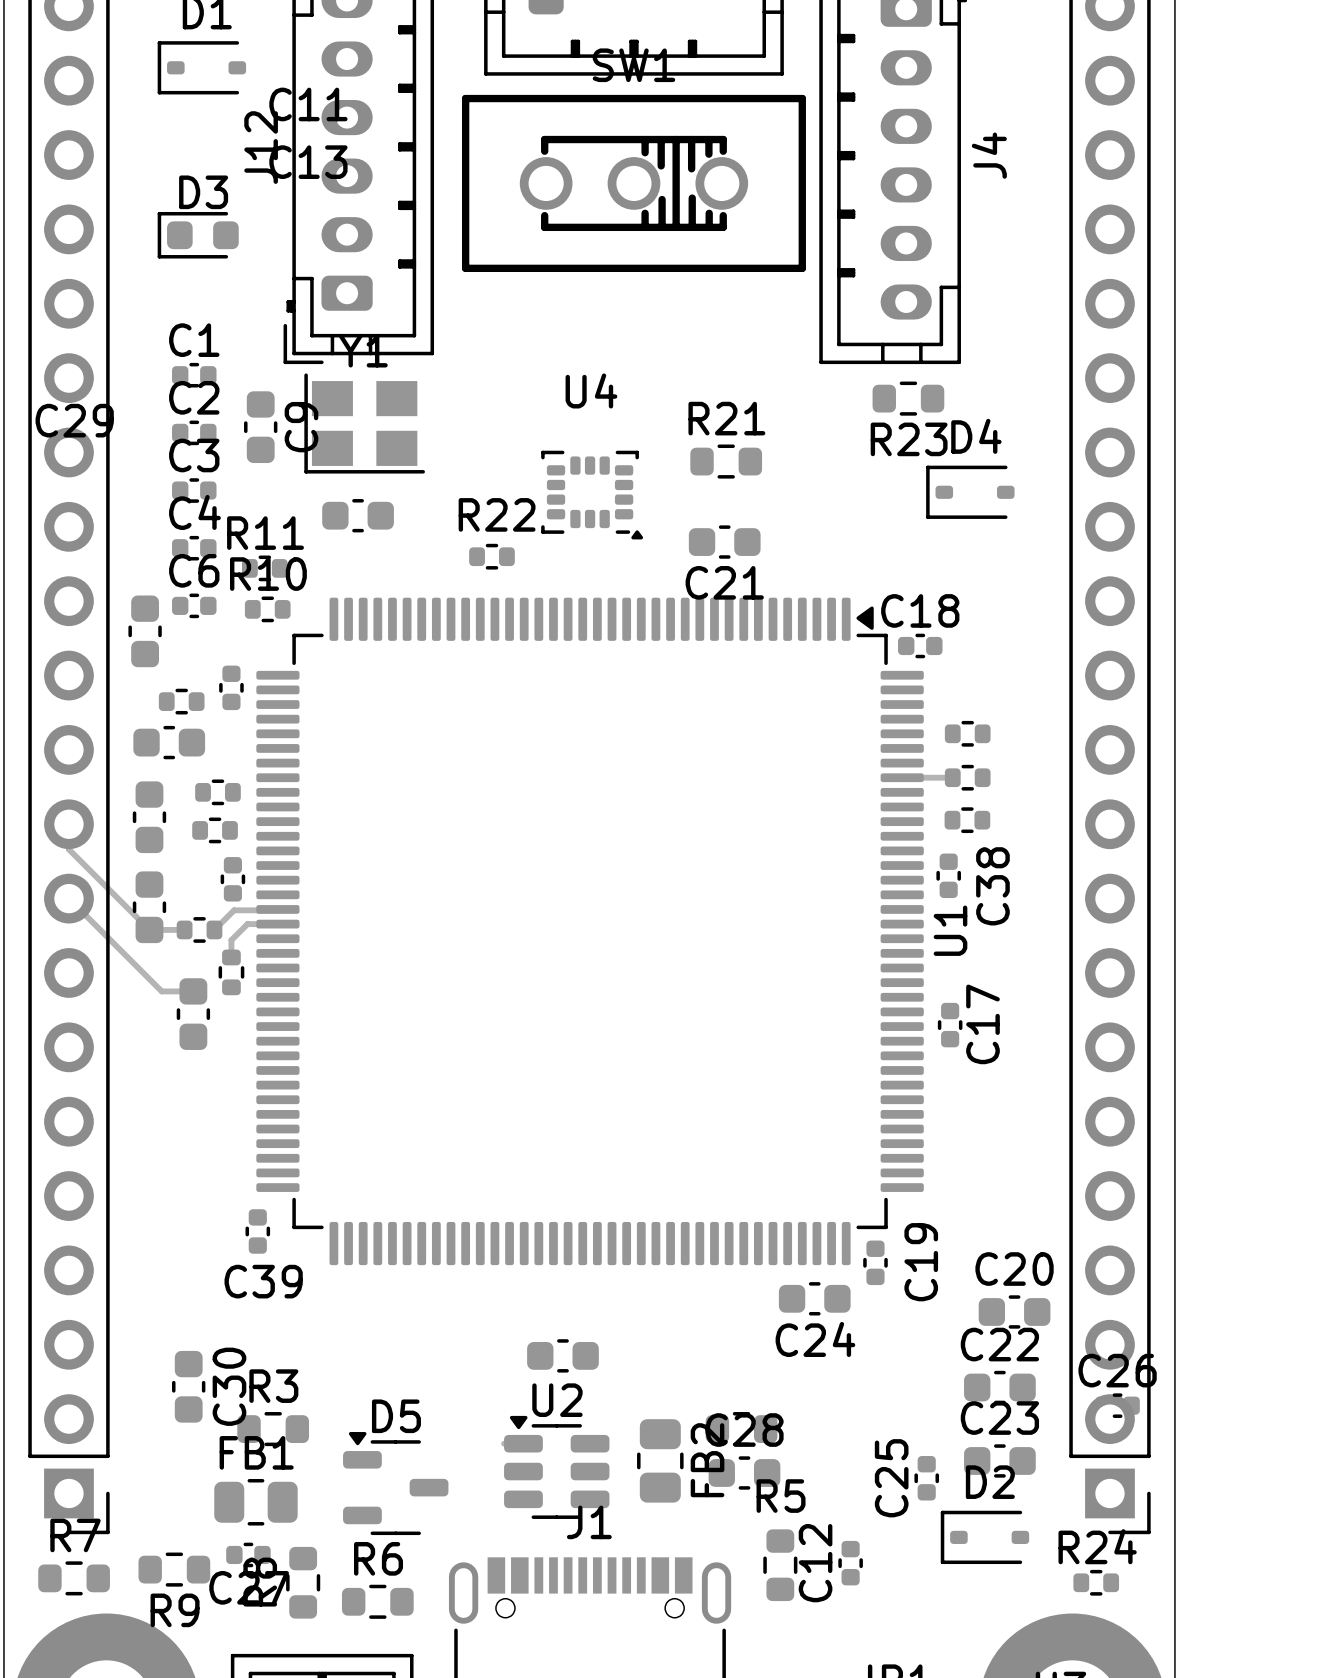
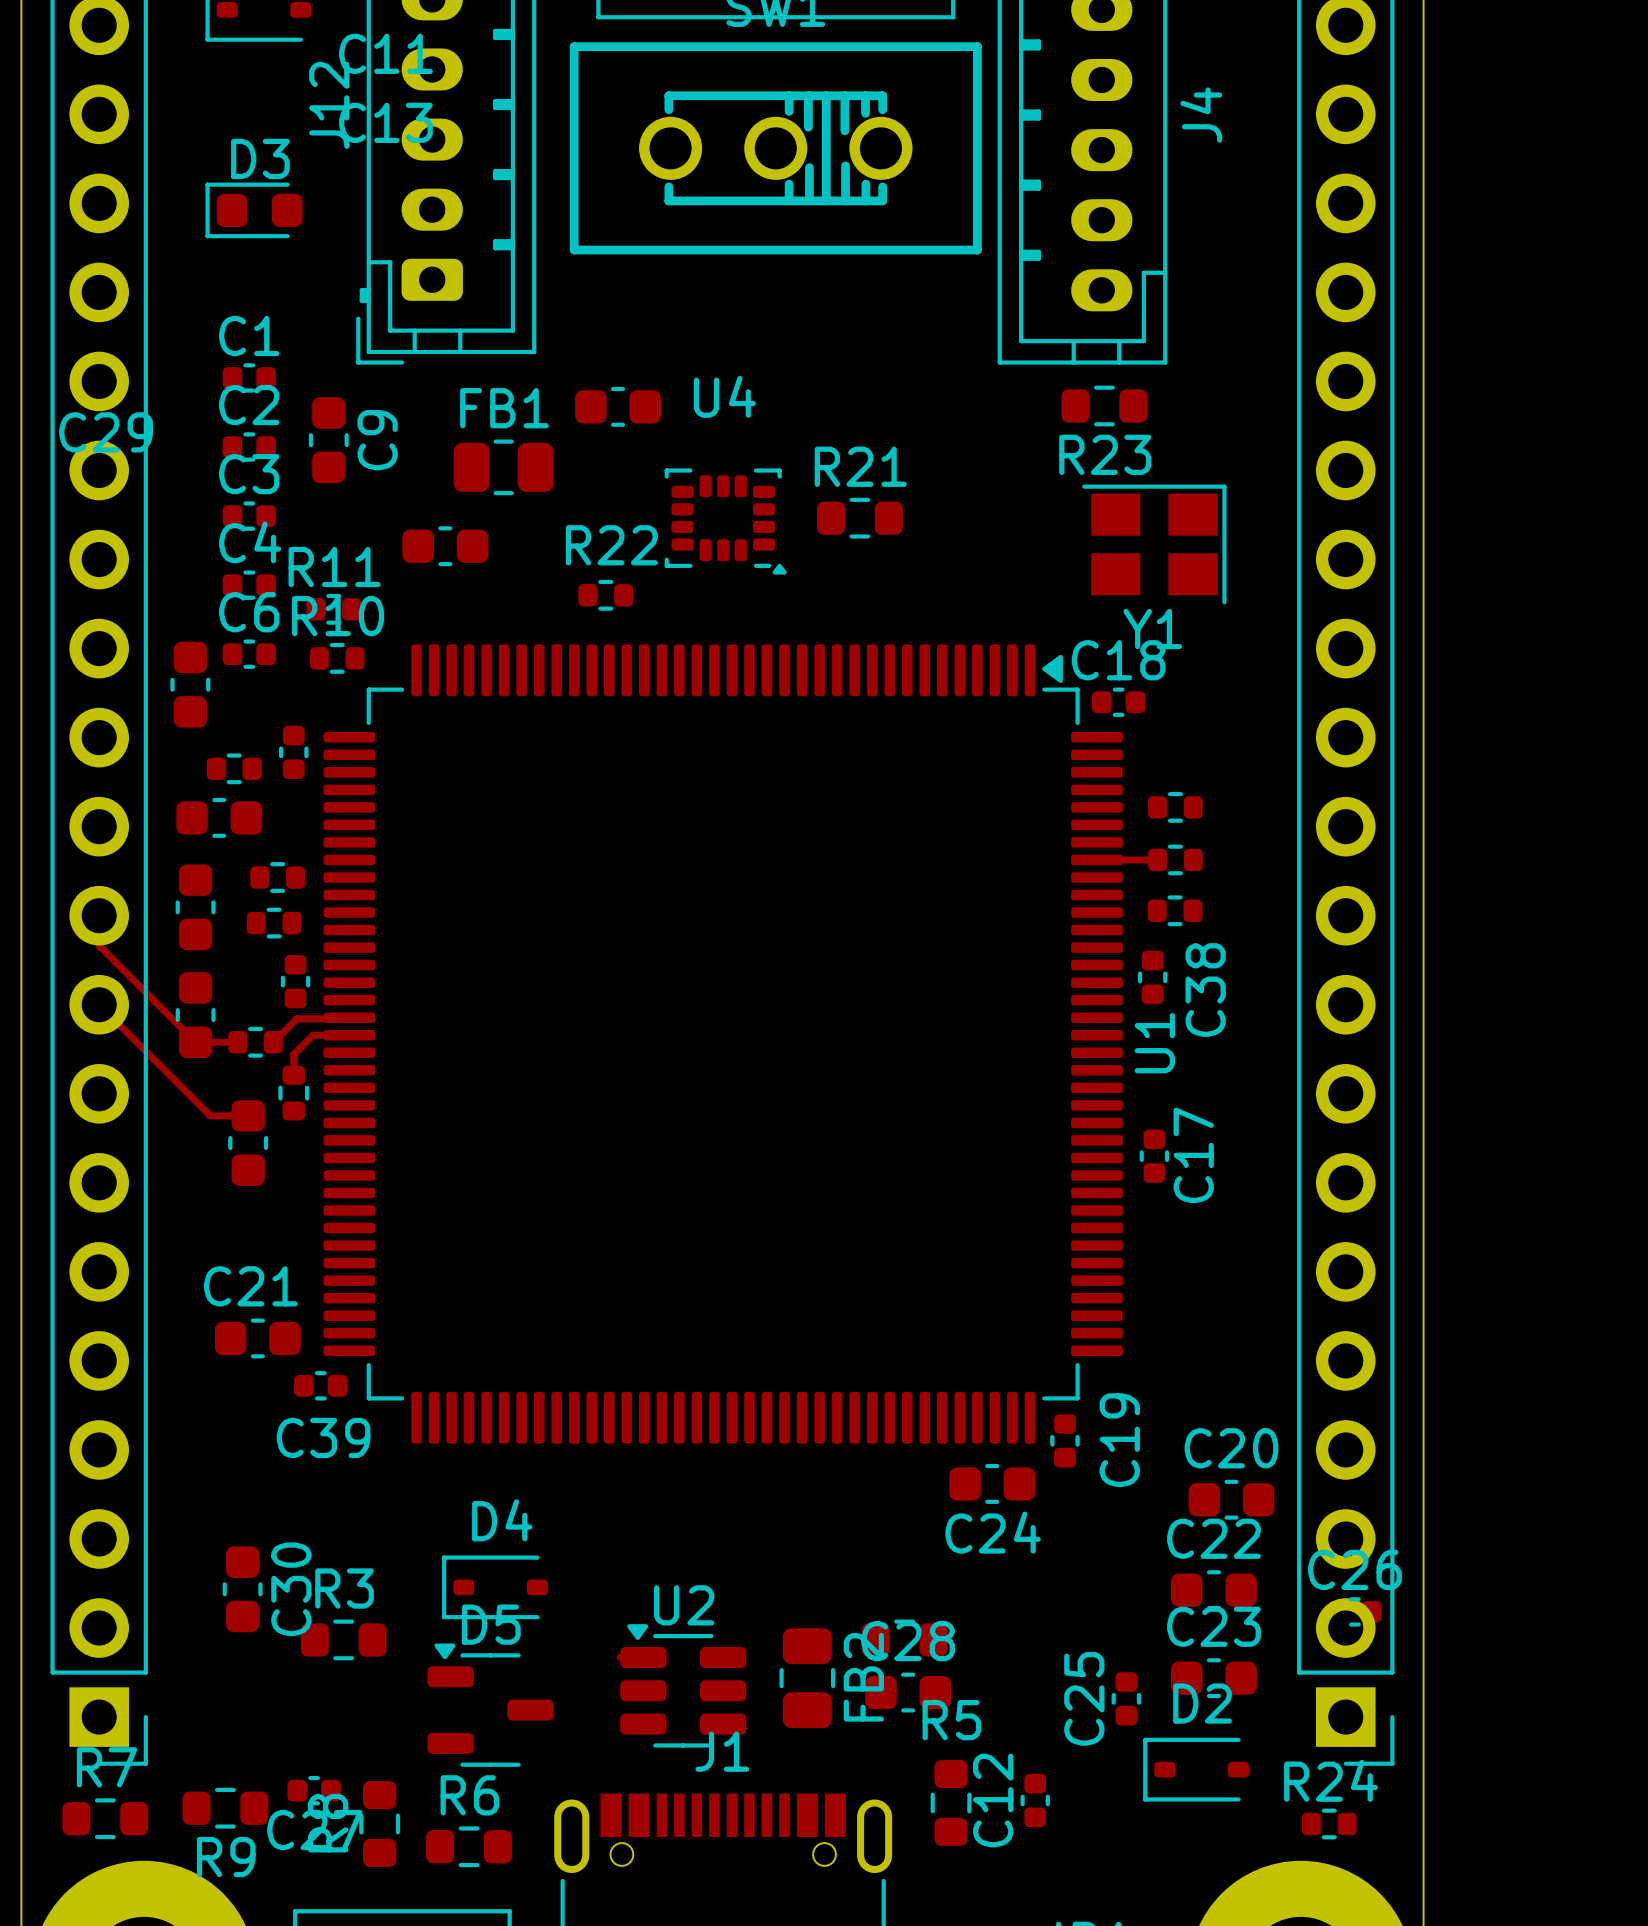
part: none -> (618, 406)
Y1 rotation: 0° (364, 423) -> 180° (1154, 544)
Y1 position: (364, 423) -> (1154, 544)
R21 position: (726, 461) -> (859, 518)
D4 position: (970, 492) -> (494, 1587)
C21 position: (724, 542) -> (257, 1338)
C21 name position: C21 (724, 582) -> C21 (250, 1286)
C39 rotation: 0° (257, 1231) -> 90° clockwise (320, 1385)
part: (562, 1355) -> none
FB1 position: (255, 1502) -> (503, 467)

